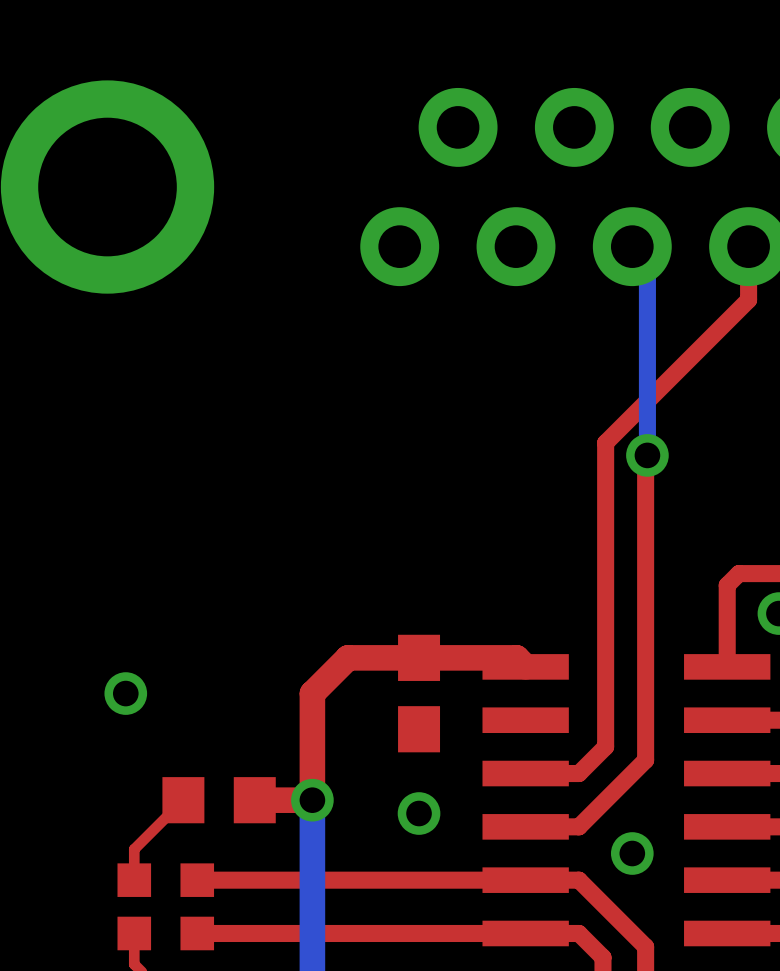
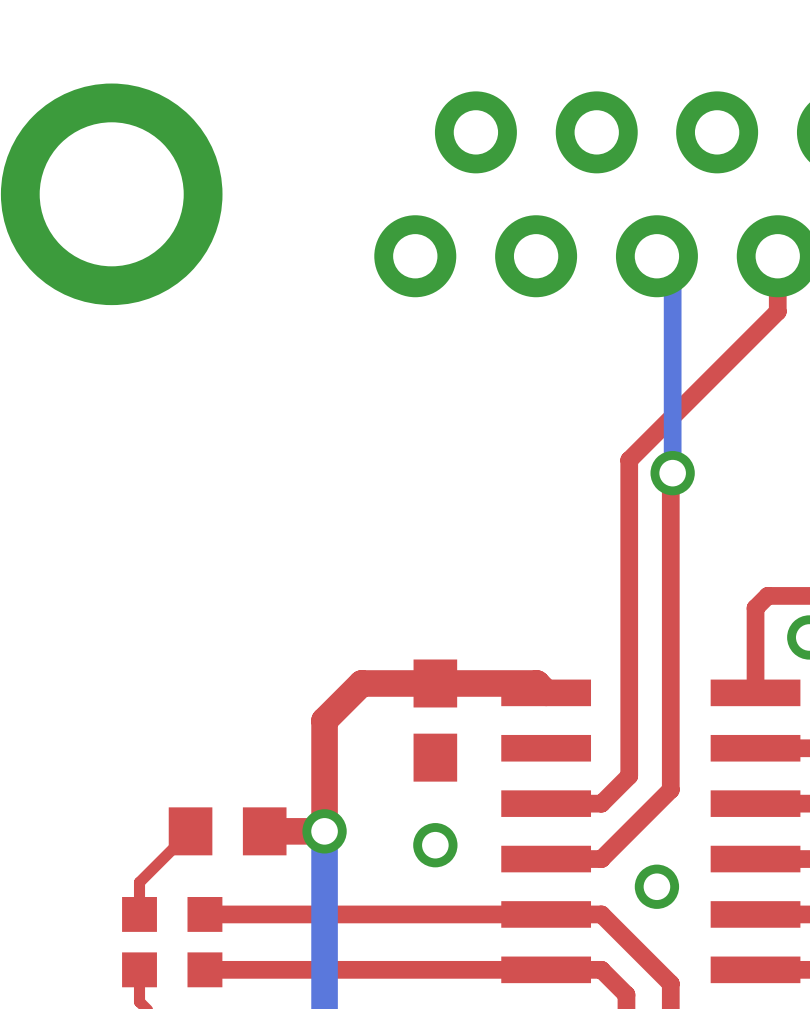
via: (125, 693) -> none

